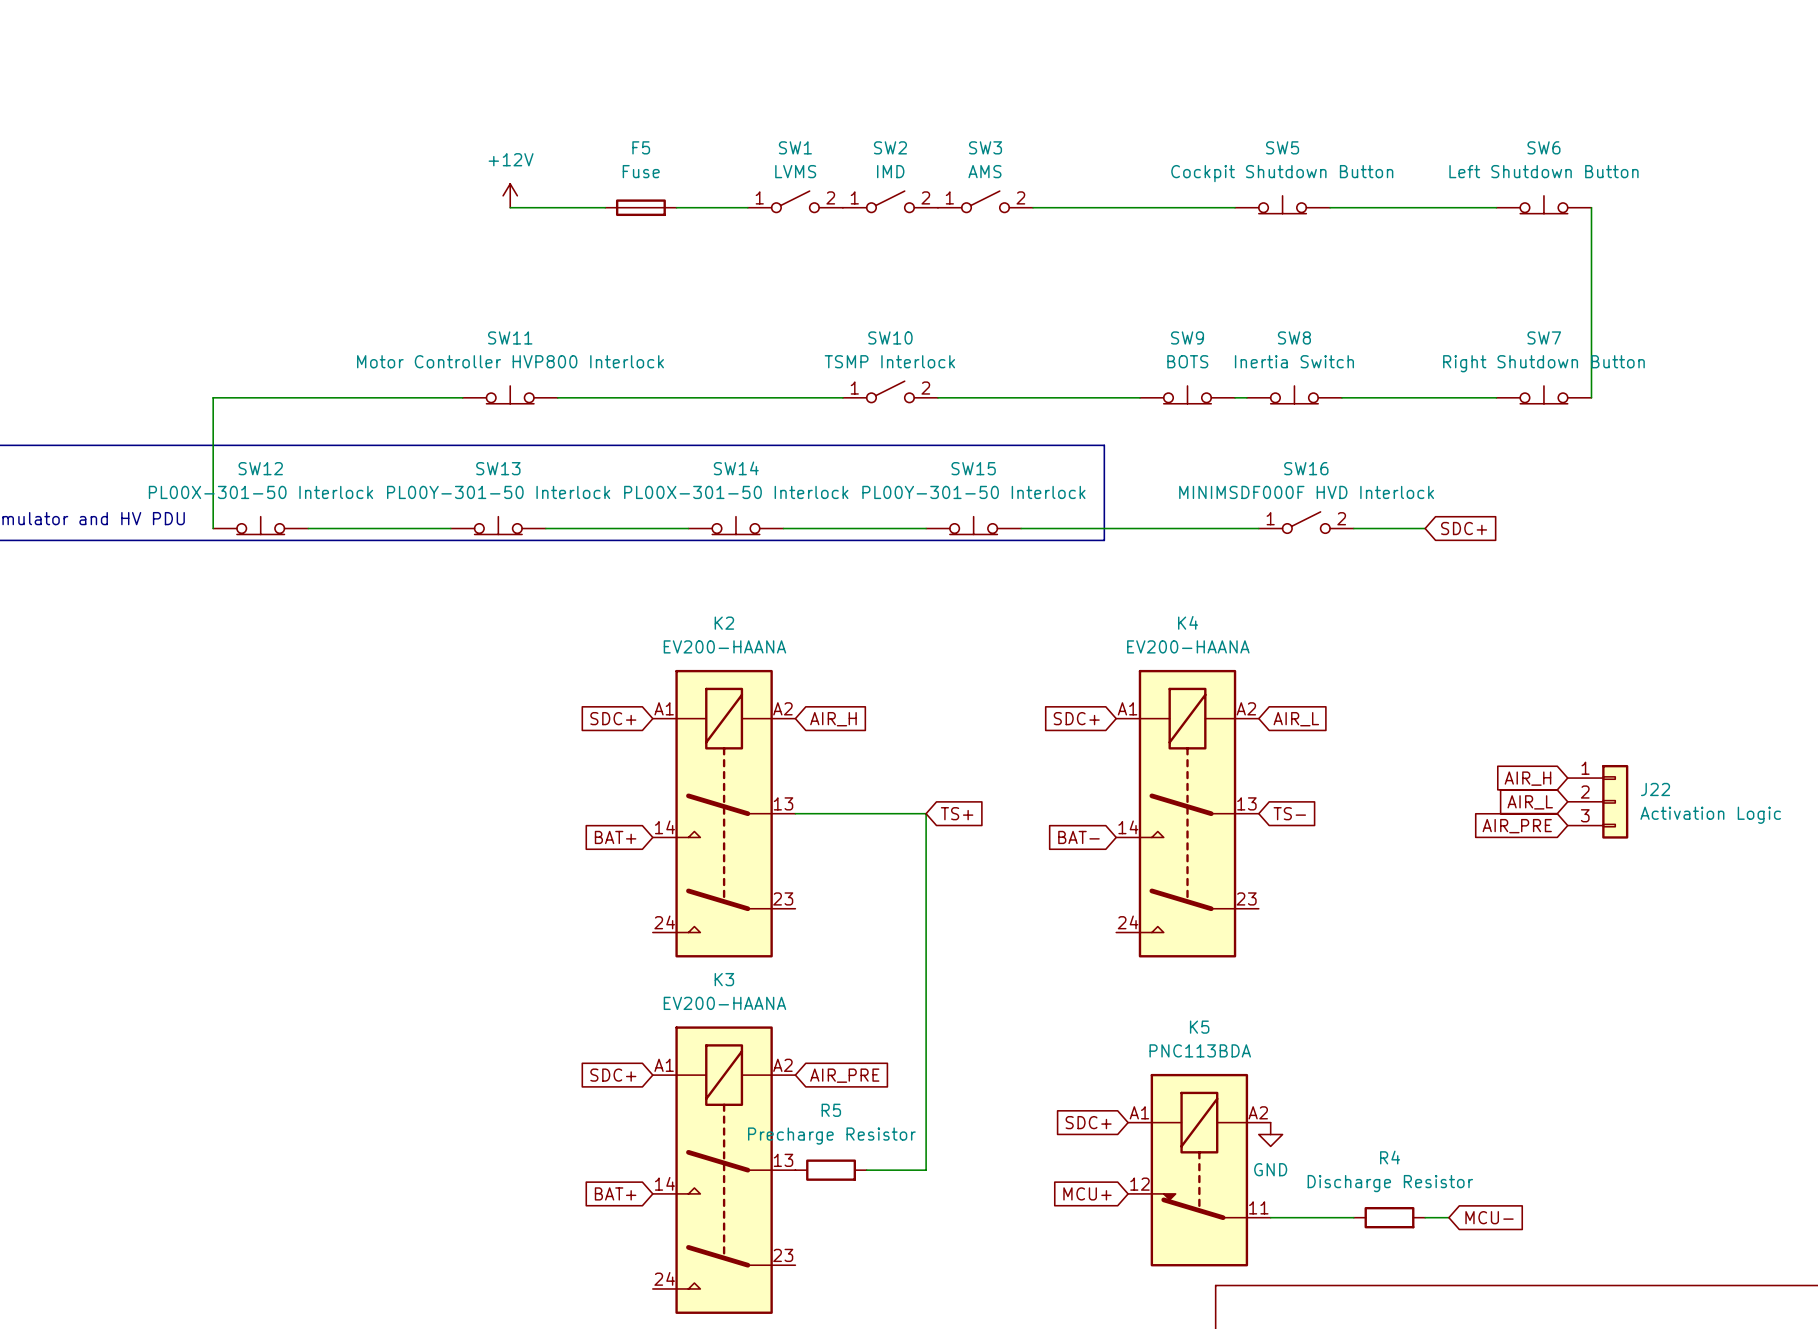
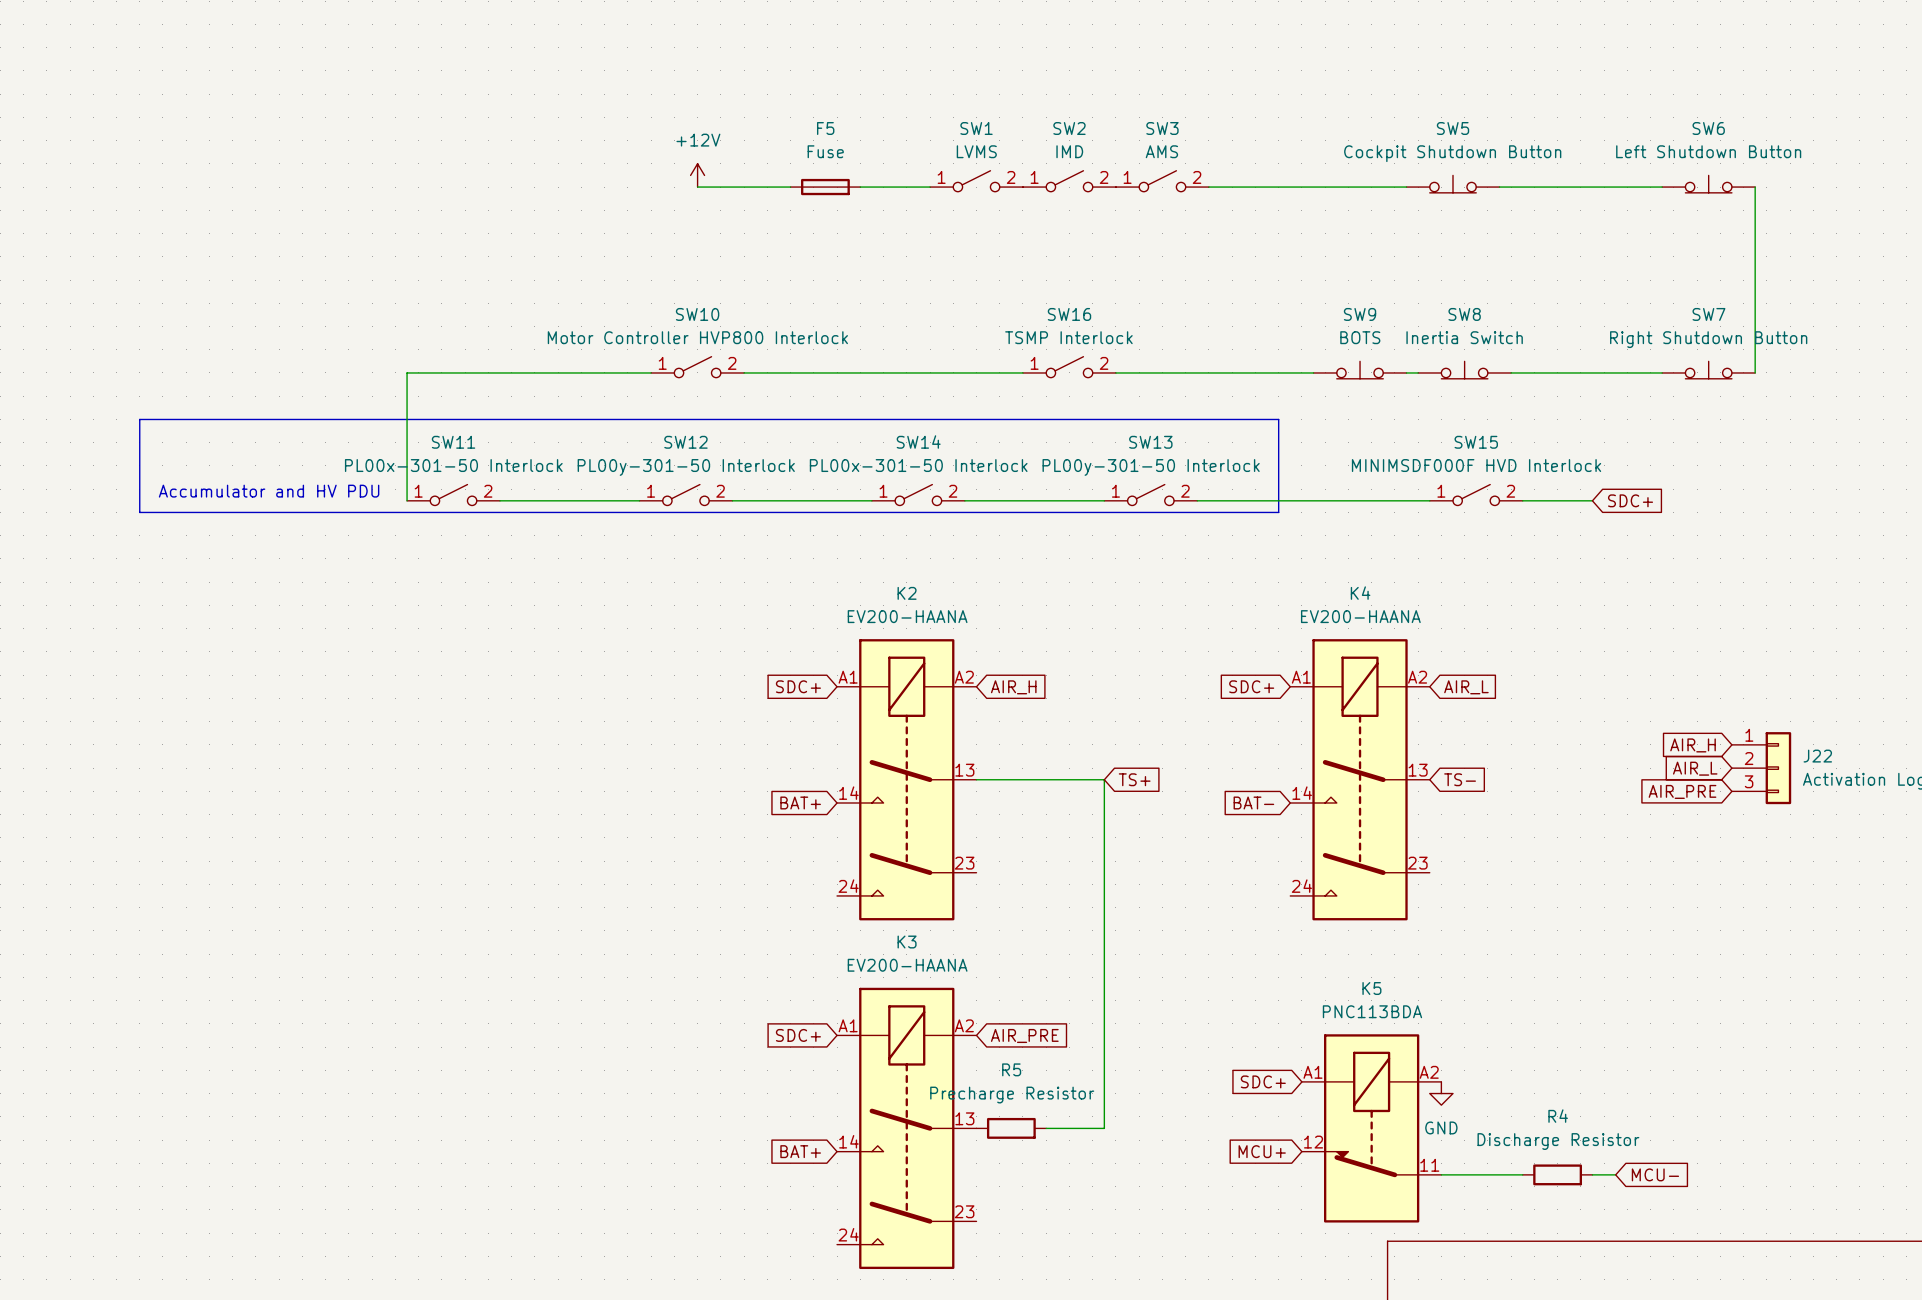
SW10 name: SW10 (890, 337) -> SW16 (1069, 314)
SW11 value: Motor Controller HVP800 Interlock (510, 361) -> PL00x-301-50 Interlock (453, 465)
SW11 symbol: [462, 385, 558, 404] -> [407, 484, 501, 506]
SW10: none -> Motor Controller HVP800 Interlock (697, 367)
SW16 name: SW16 (1306, 468) -> SW15 (1476, 442)
SW12 value: PL00X-301-50 Interlock (260, 492) -> PL00y-301-50 Interlock (686, 467)
SW13 value: PL00Y-301-50 Interlock (498, 492) -> PL00y-301-50 Interlock (1151, 467)
SW14 value: PL00X-301-50 Interlock (736, 492) -> PL00x-301-50 Interlock (918, 465)
SW12 symbol: [213, 516, 309, 535] -> [639, 484, 733, 506]
SW13 symbol: [450, 516, 546, 535] -> [1104, 484, 1198, 506]
SW14 symbol: [688, 516, 784, 535] -> [871, 484, 965, 506]
SW15: PL00Y-301-50 Interlock (973, 525) -> none

